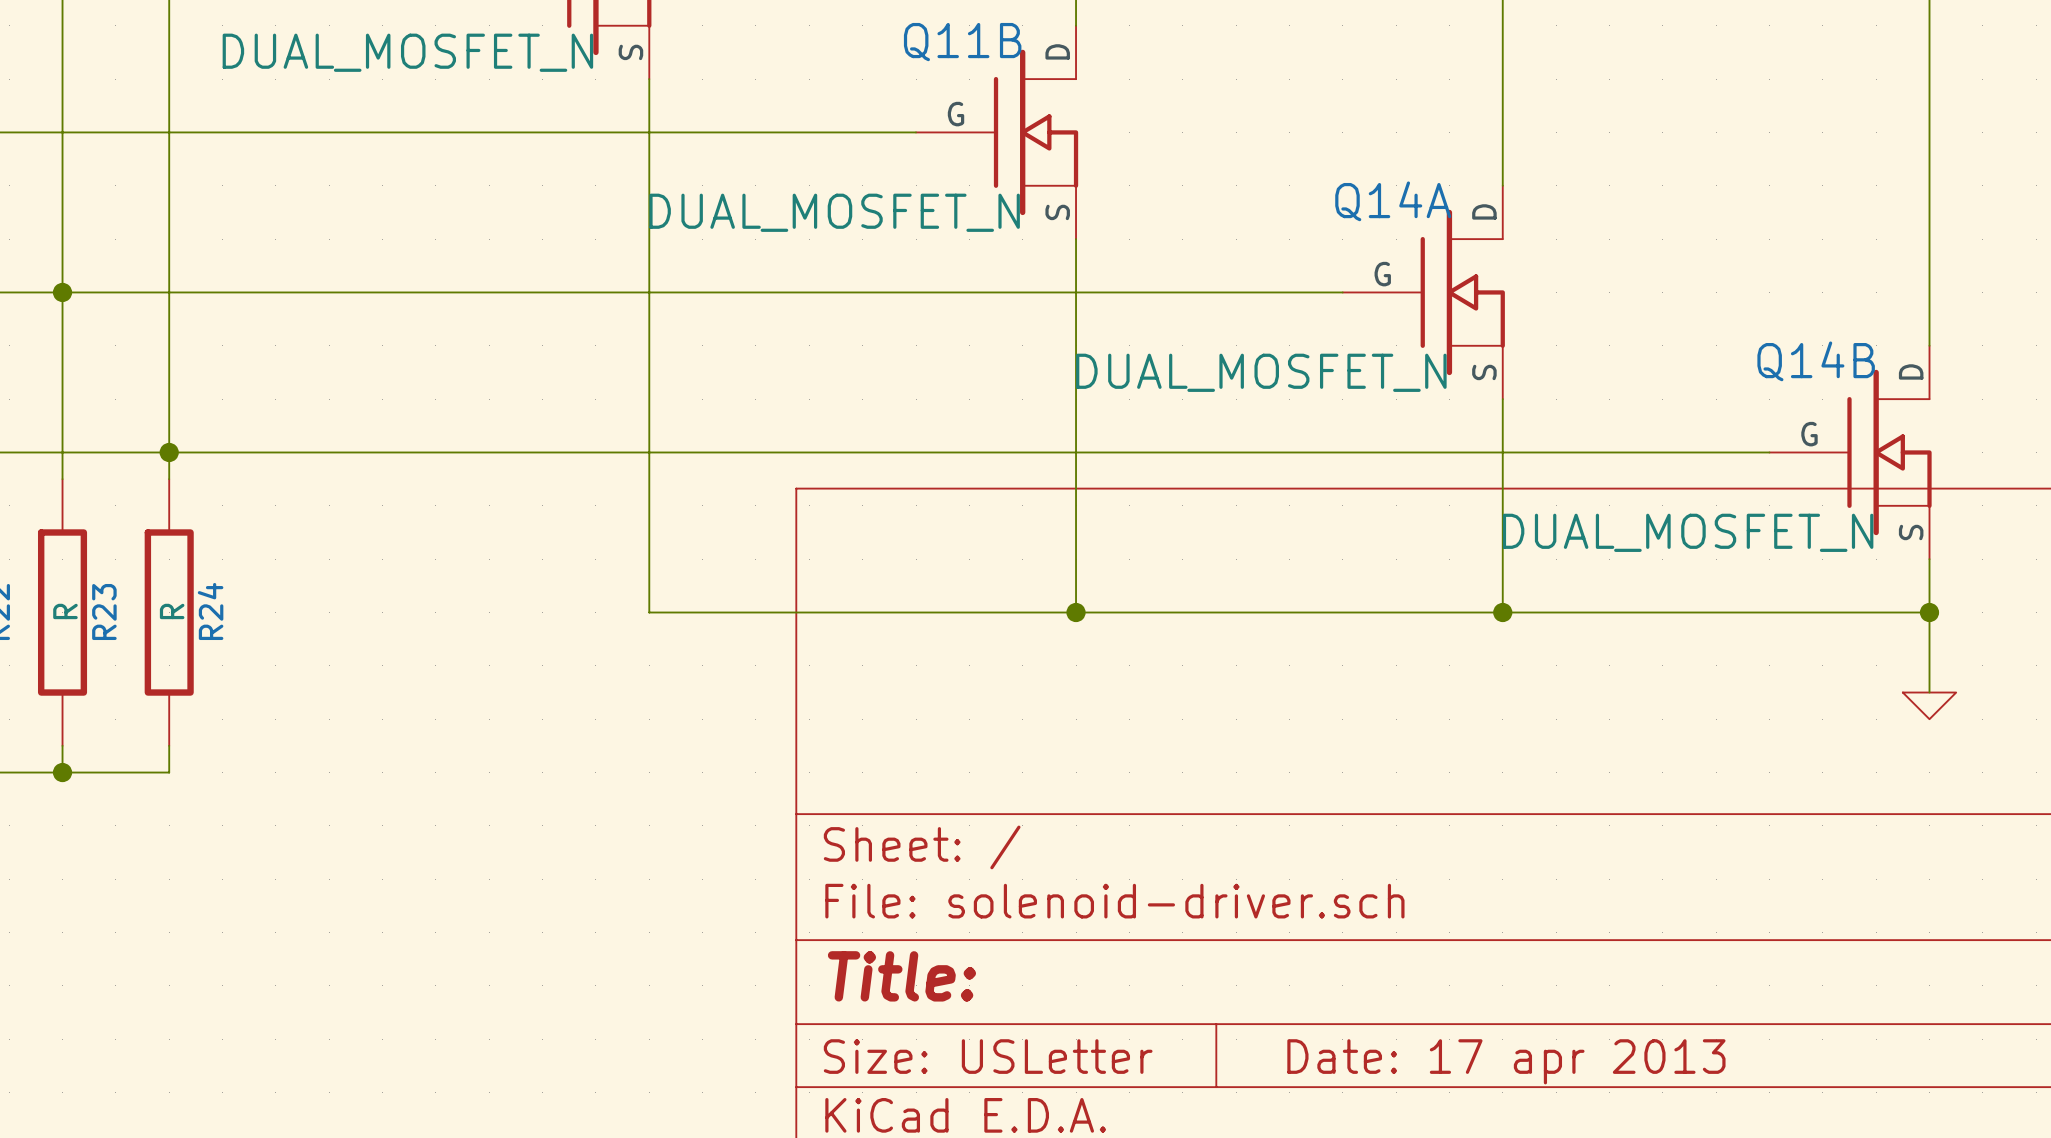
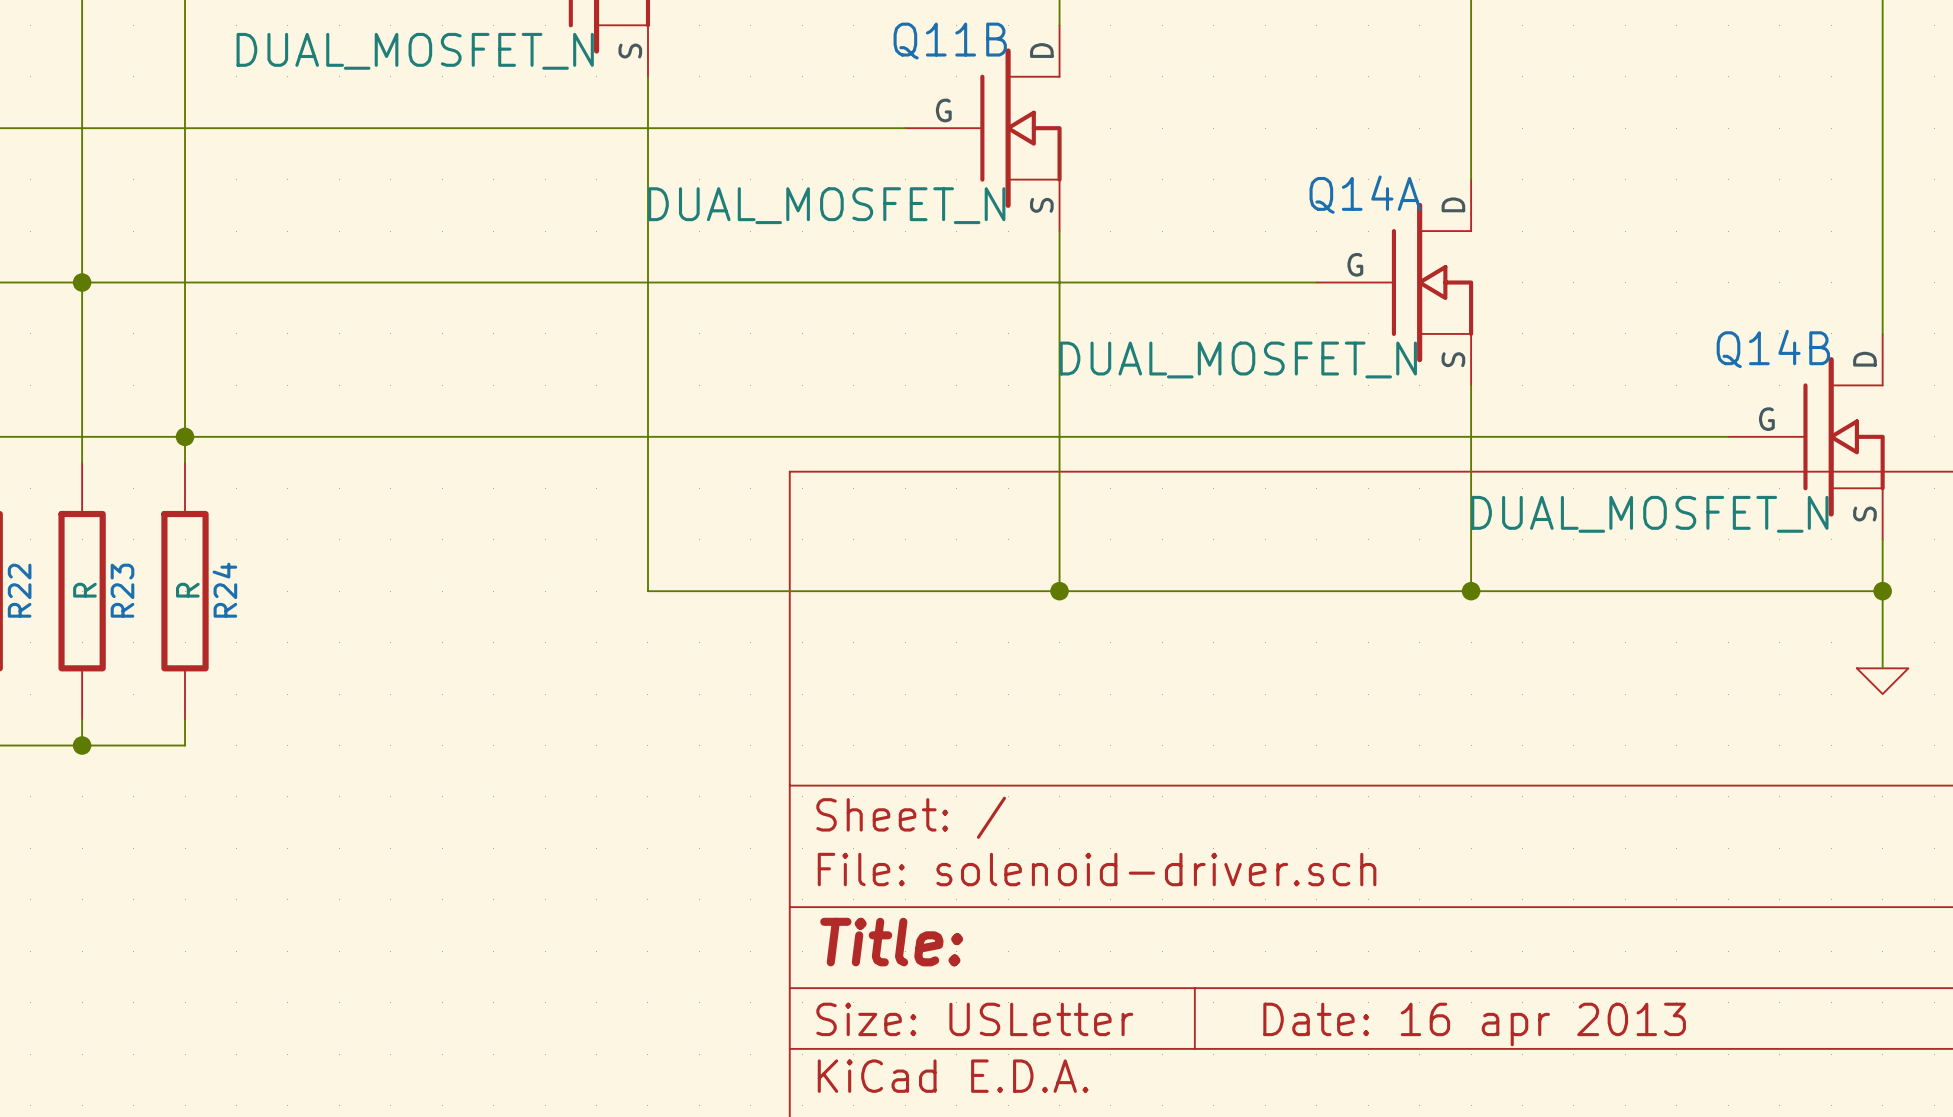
title block: Date: 17 apr 2013 (1506, 1061) -> Date: 16 apr 2013 (1474, 1024)

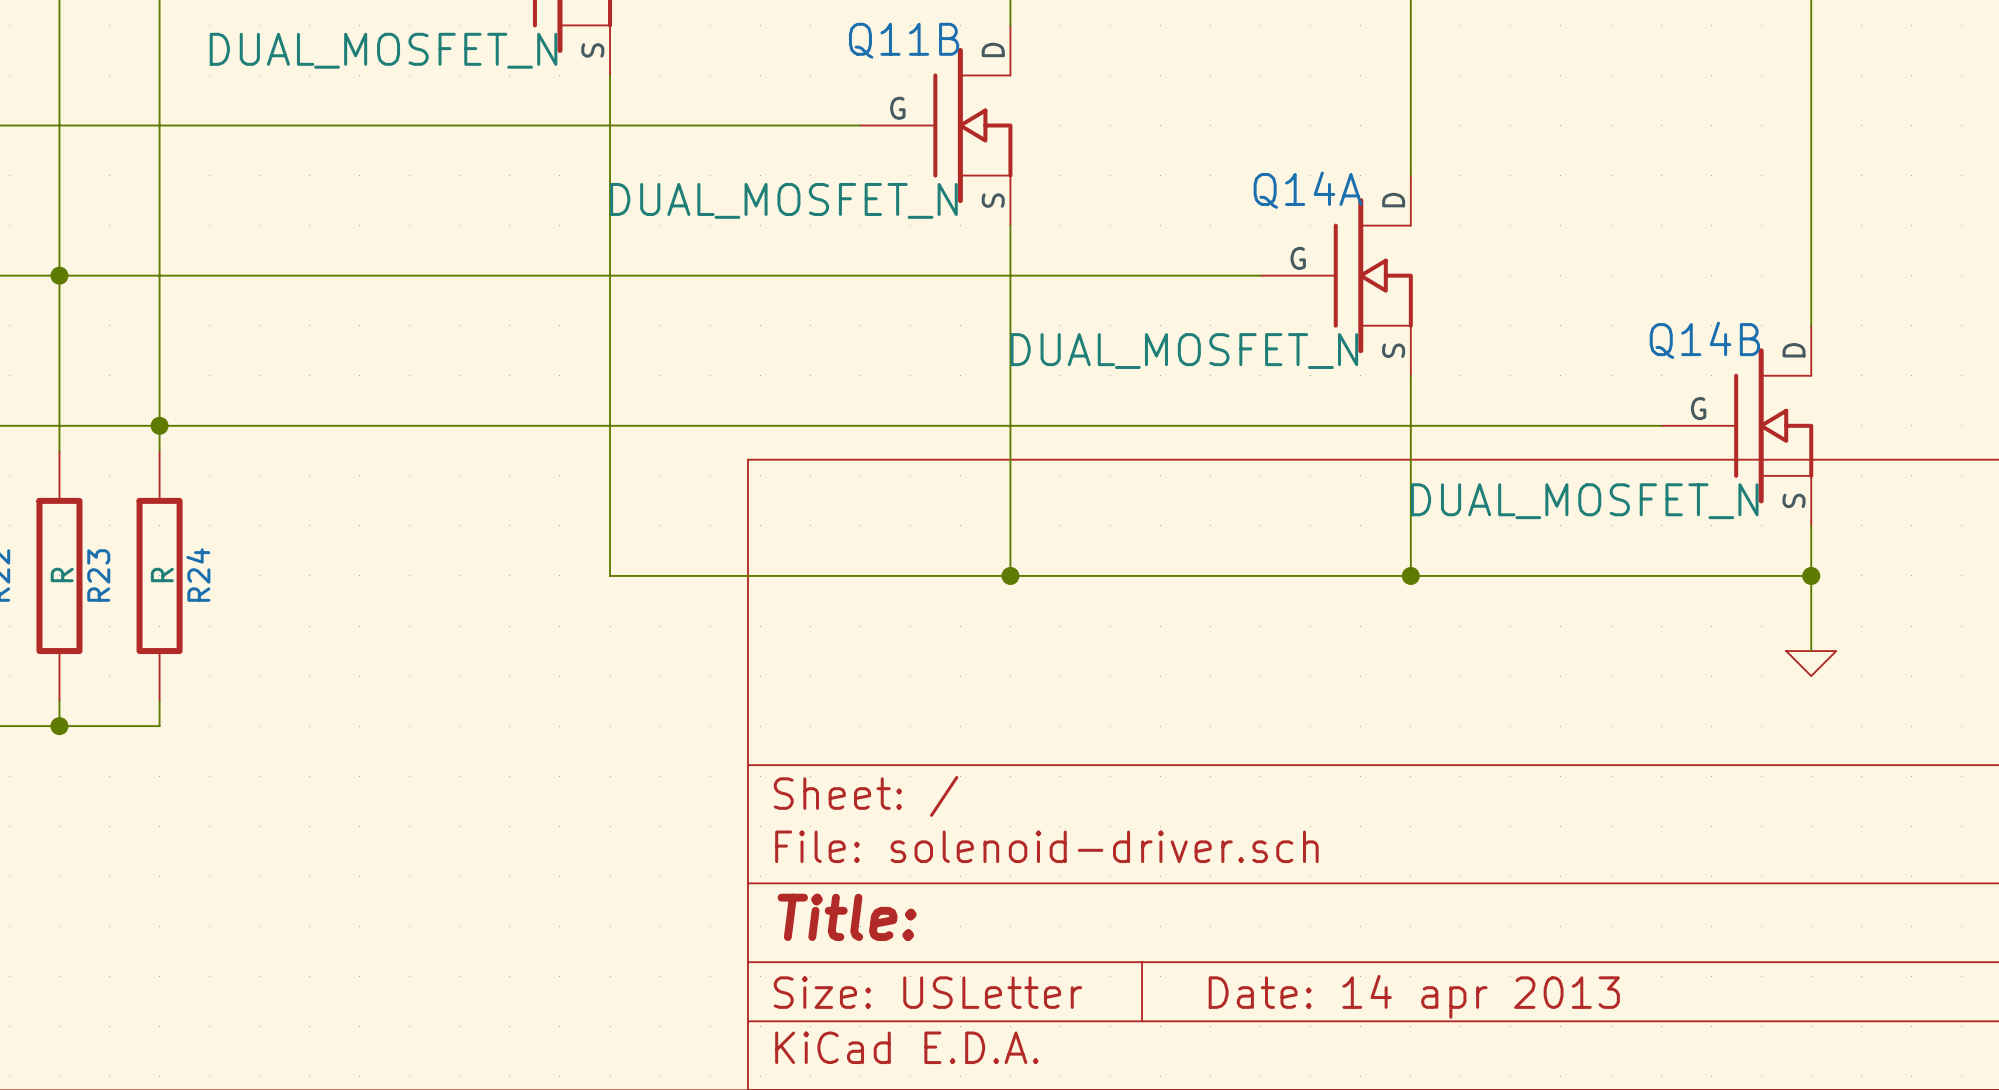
title block: Date: 16 apr 2013 (1474, 1024) -> Date: 14 apr 2013 (1414, 996)

